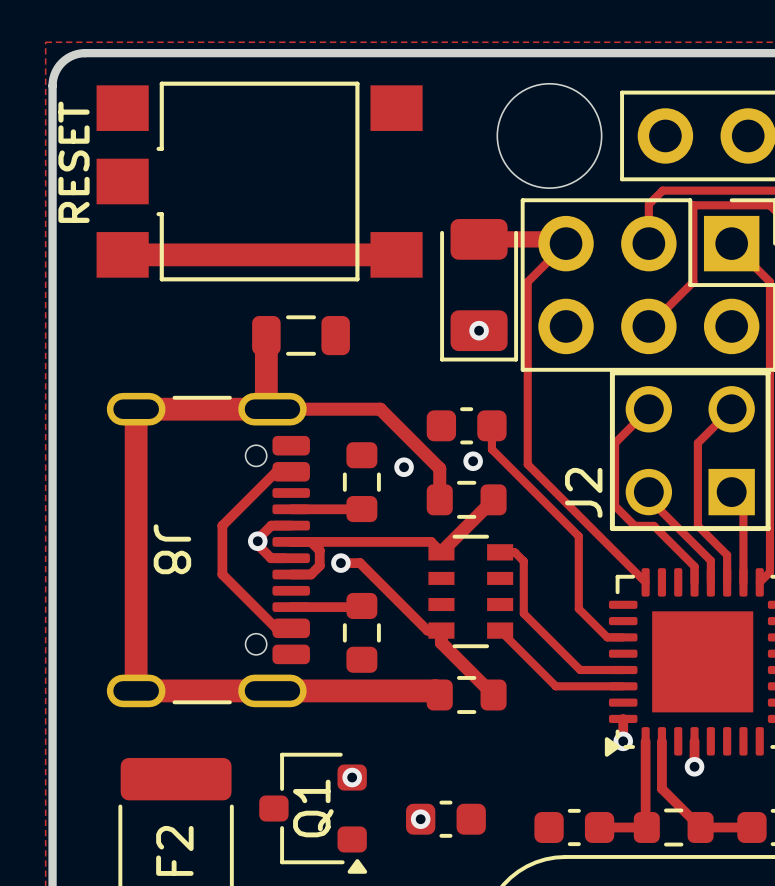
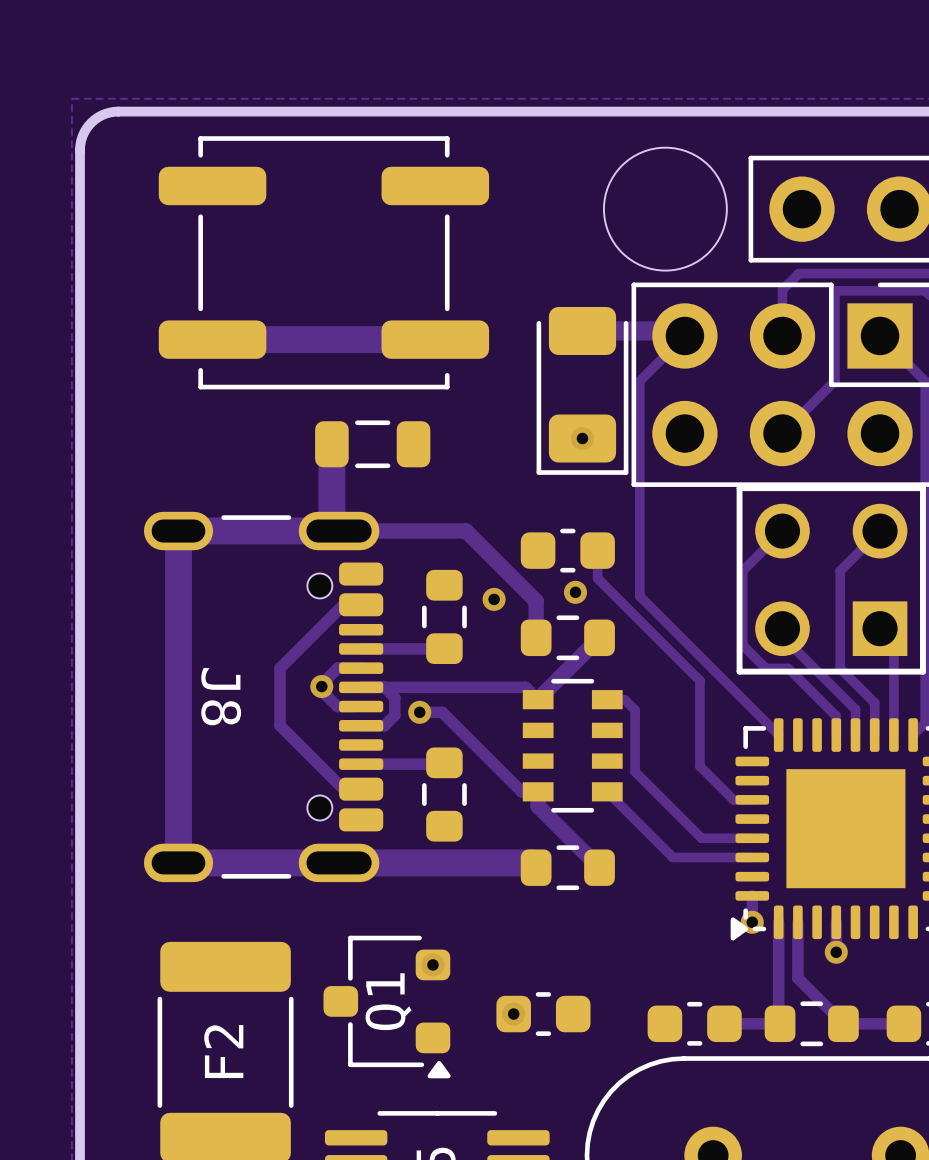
part footprint: [96, 81, 423, 282] -> [158, 136, 490, 390]
text: RESET (74, 162) -> none
track: none -> (212, 339) (435, 339)
track: (122, 254) (396, 254) -> none
J2 name: J2 (583, 492) -> none

